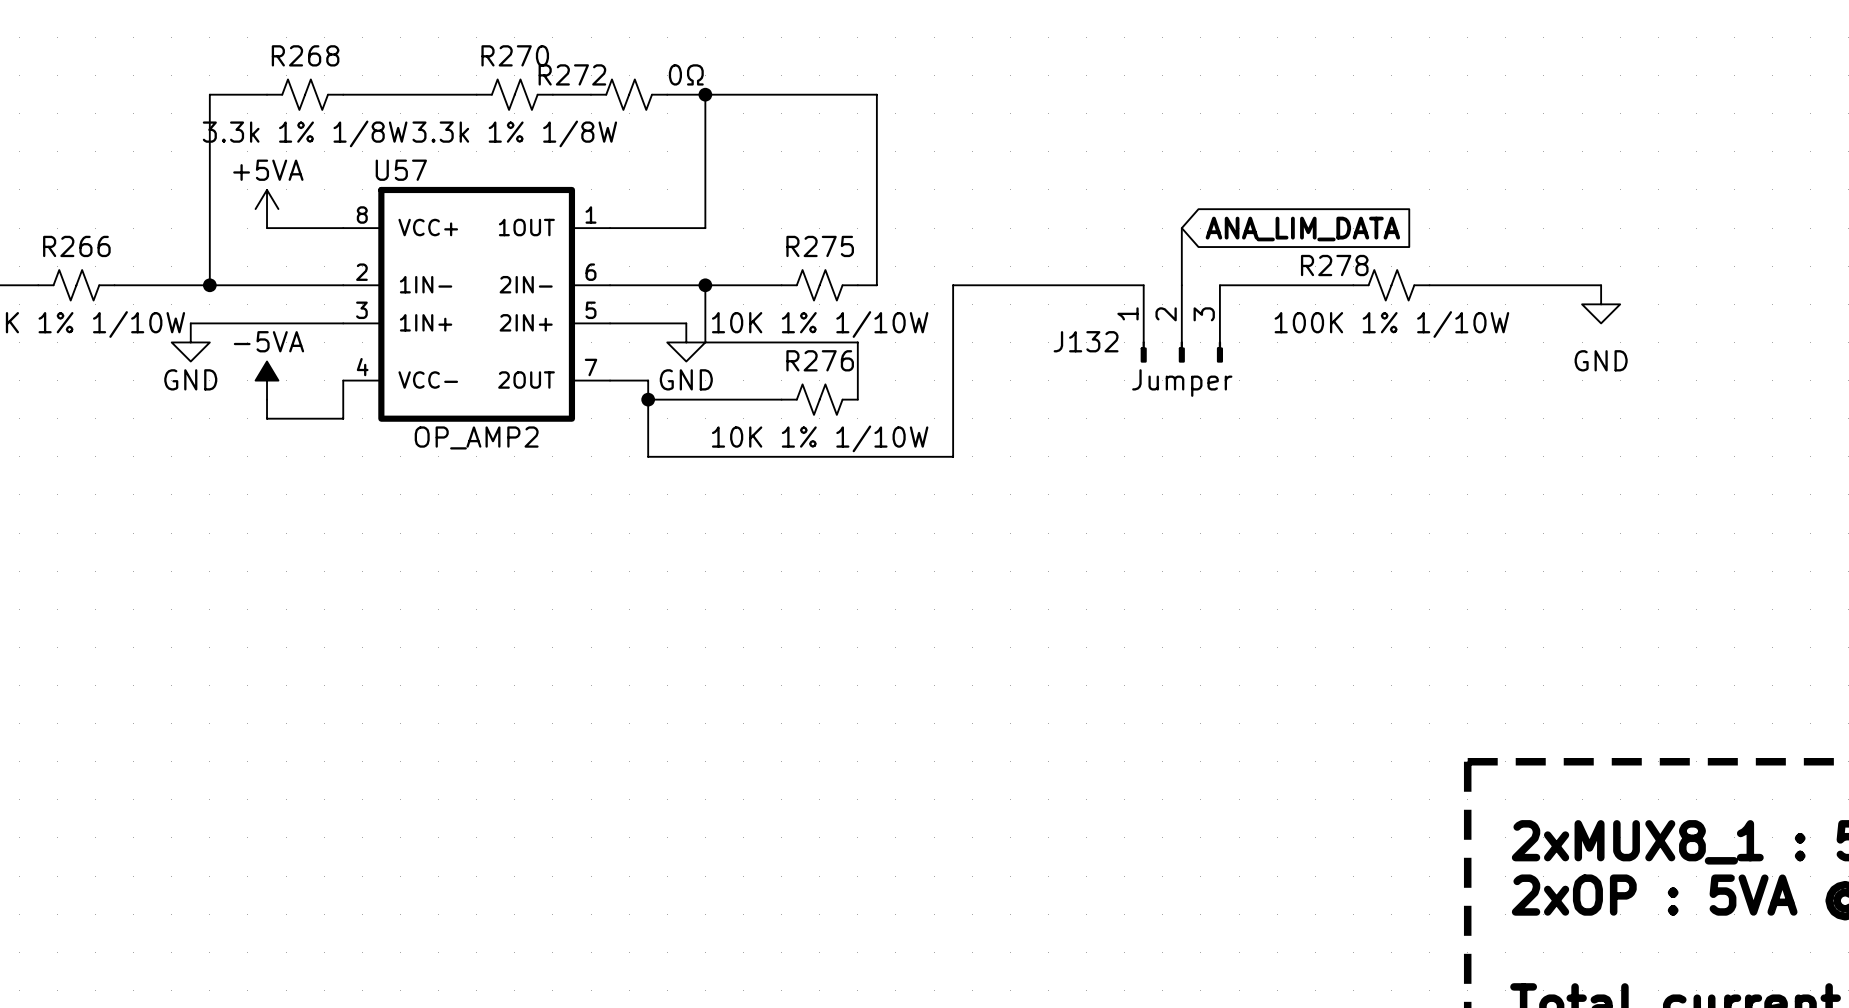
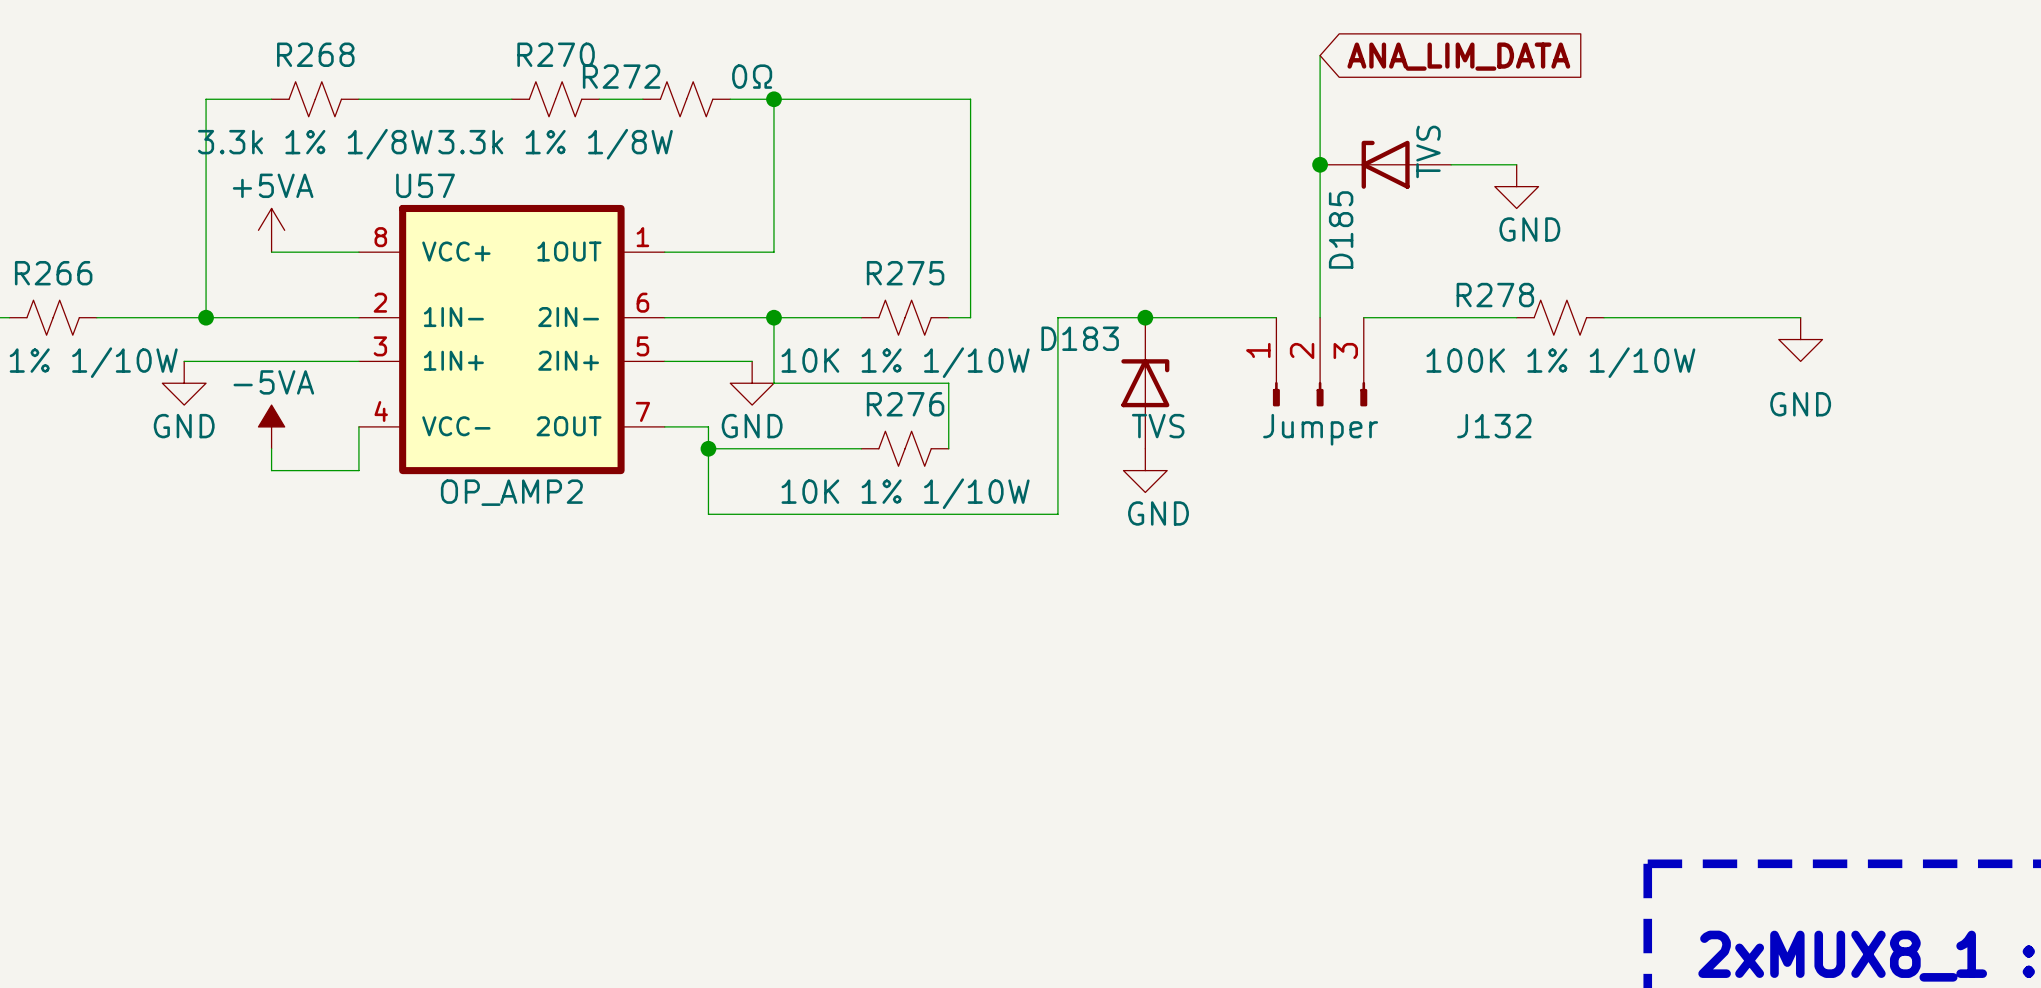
wire: none -> (1320, 55) (1320, 252)
junction: none -> (1320, 164)
D185: none -> TVS (1385, 164)
wire: none -> (1451, 164) (1516, 164)
power symbol: none -> GND (1516, 186)
global label position: ANA_LIM_DATA (1302, 229) -> ANA_LIM_DATA (1458, 56)
junction: none -> (1145, 317)
J132 name position: J132 (1086, 341) -> J132 (1494, 426)
D183: none -> TVS (1145, 383)
power symbol: none -> GND (1145, 470)

